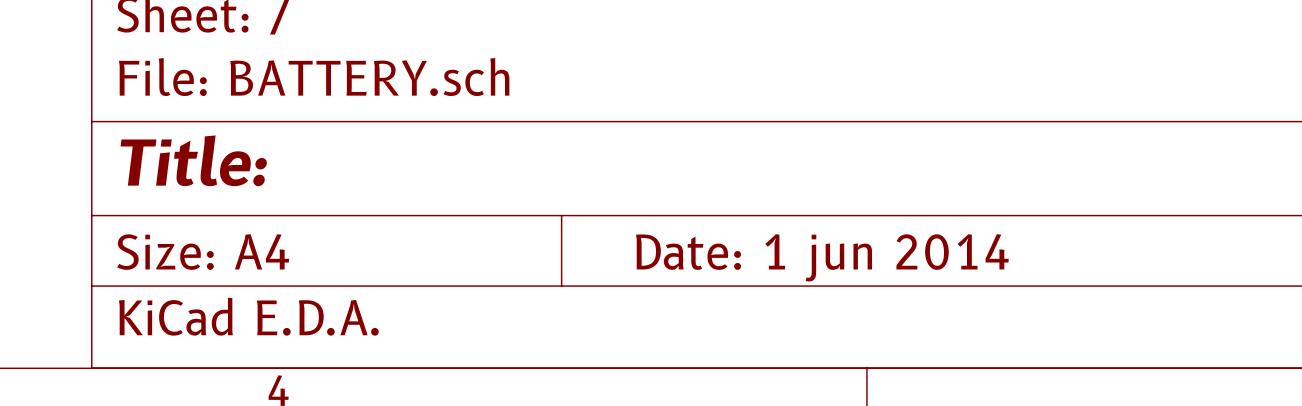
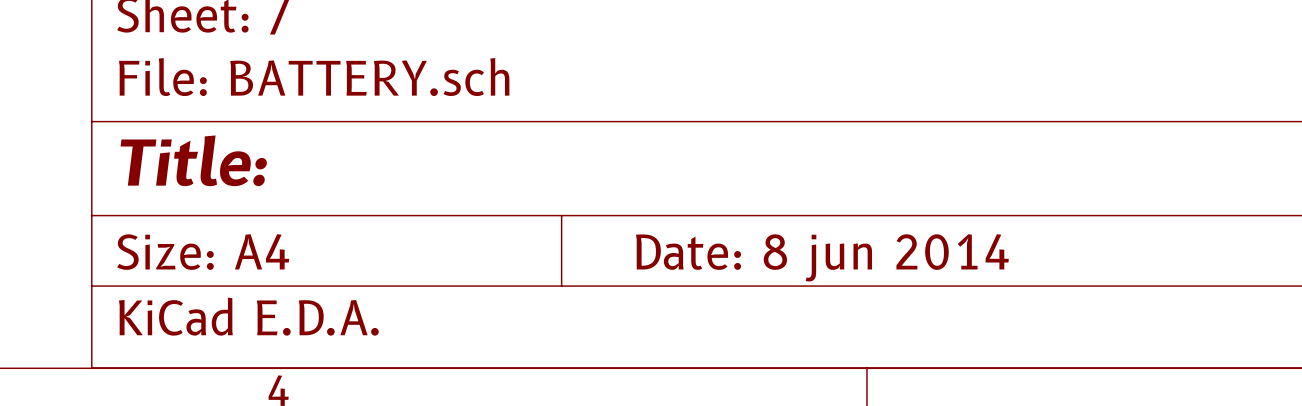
title block: Date: 1 jun 2014 (822, 257) -> Date: 8 jun 2014 (822, 257)

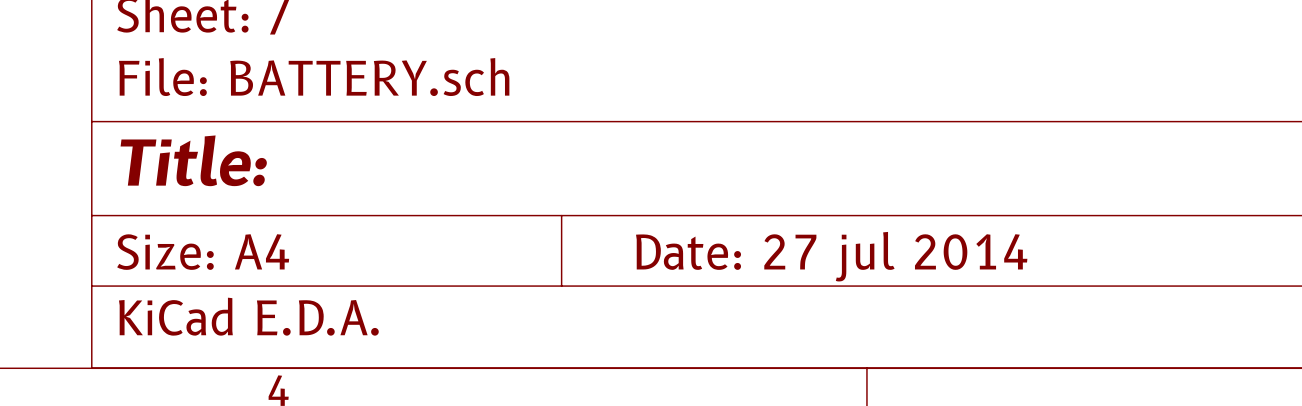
title block: Date: 8 jun 2014 (822, 257) -> Date: 27 jul 2014 (831, 256)

